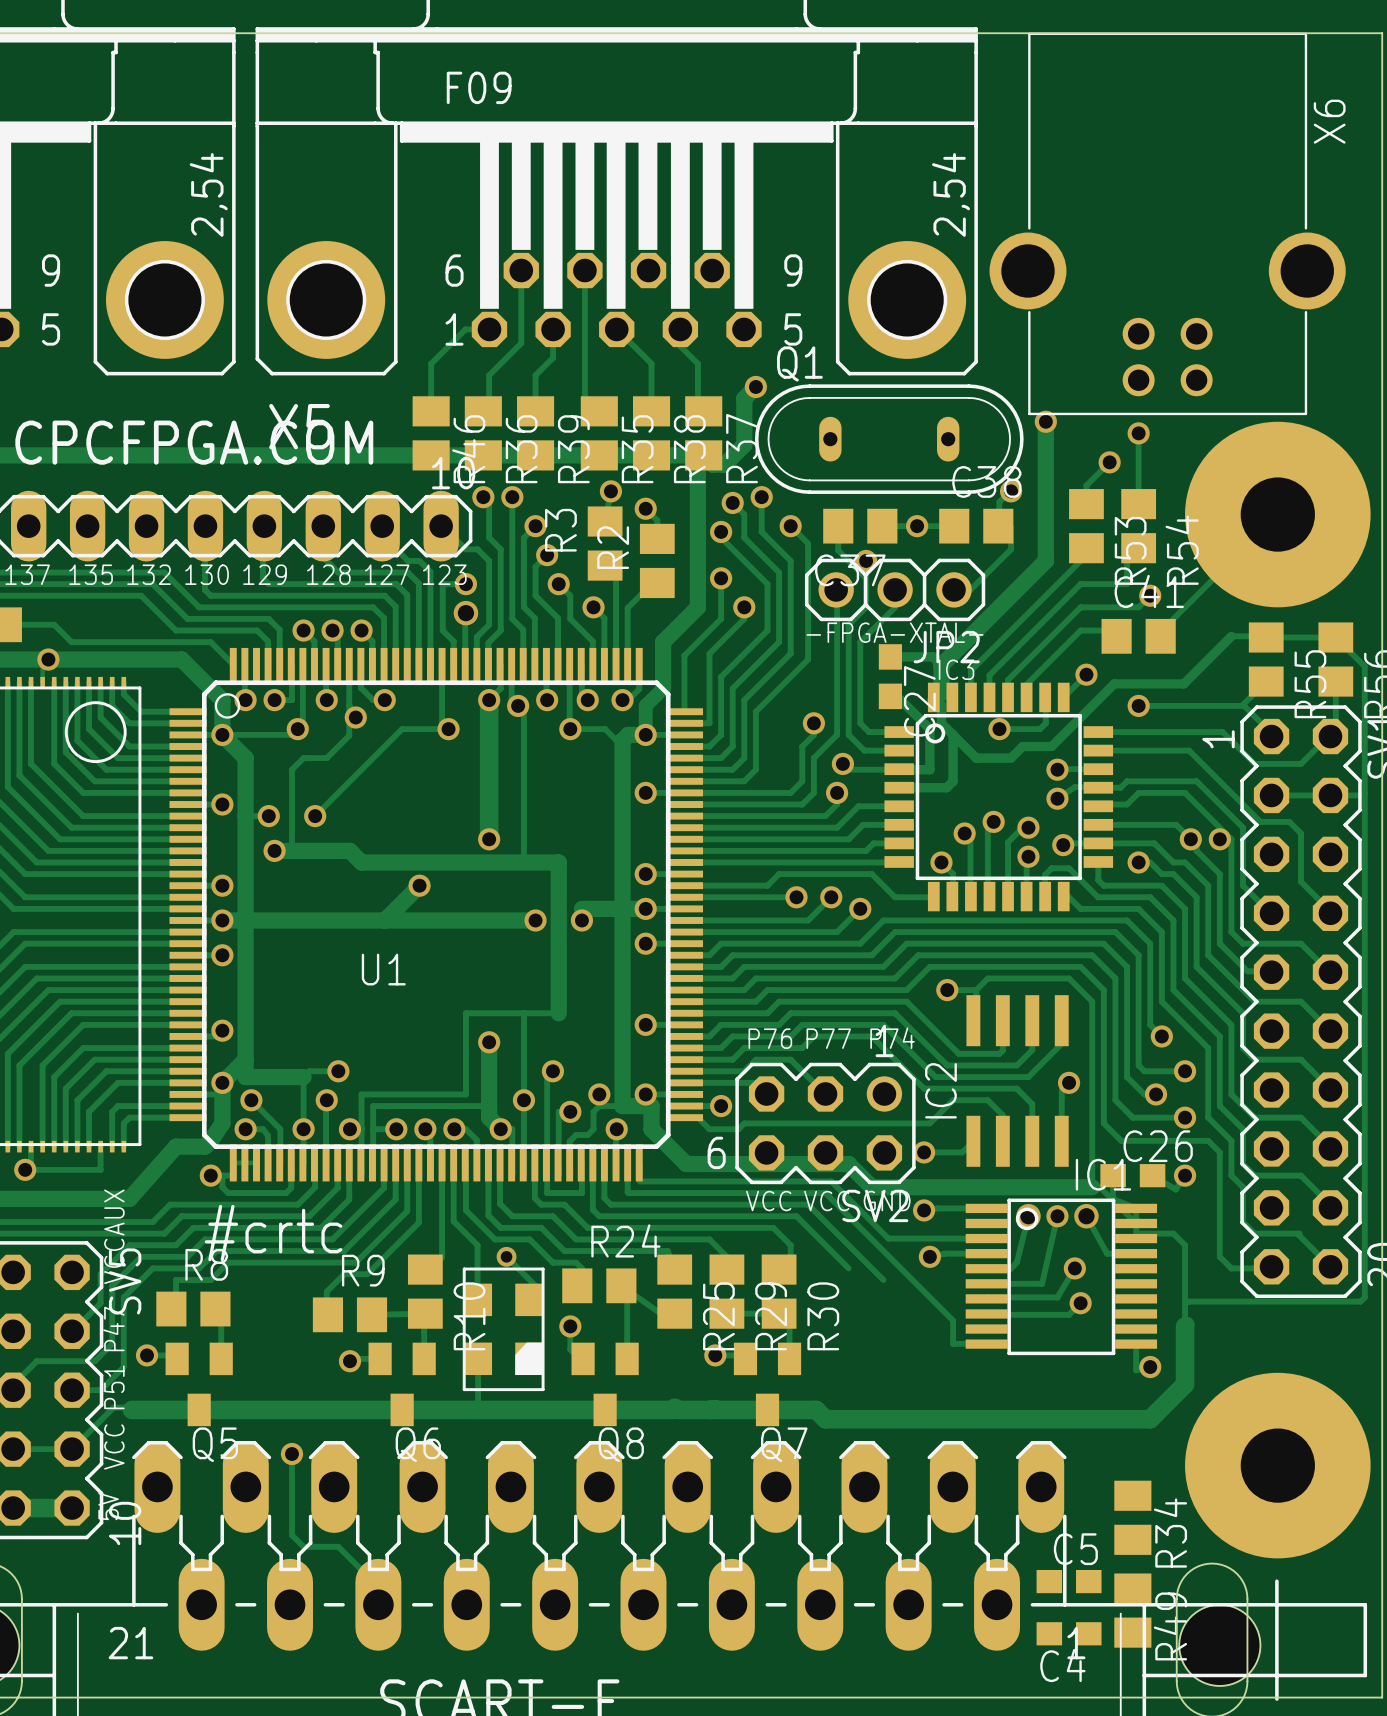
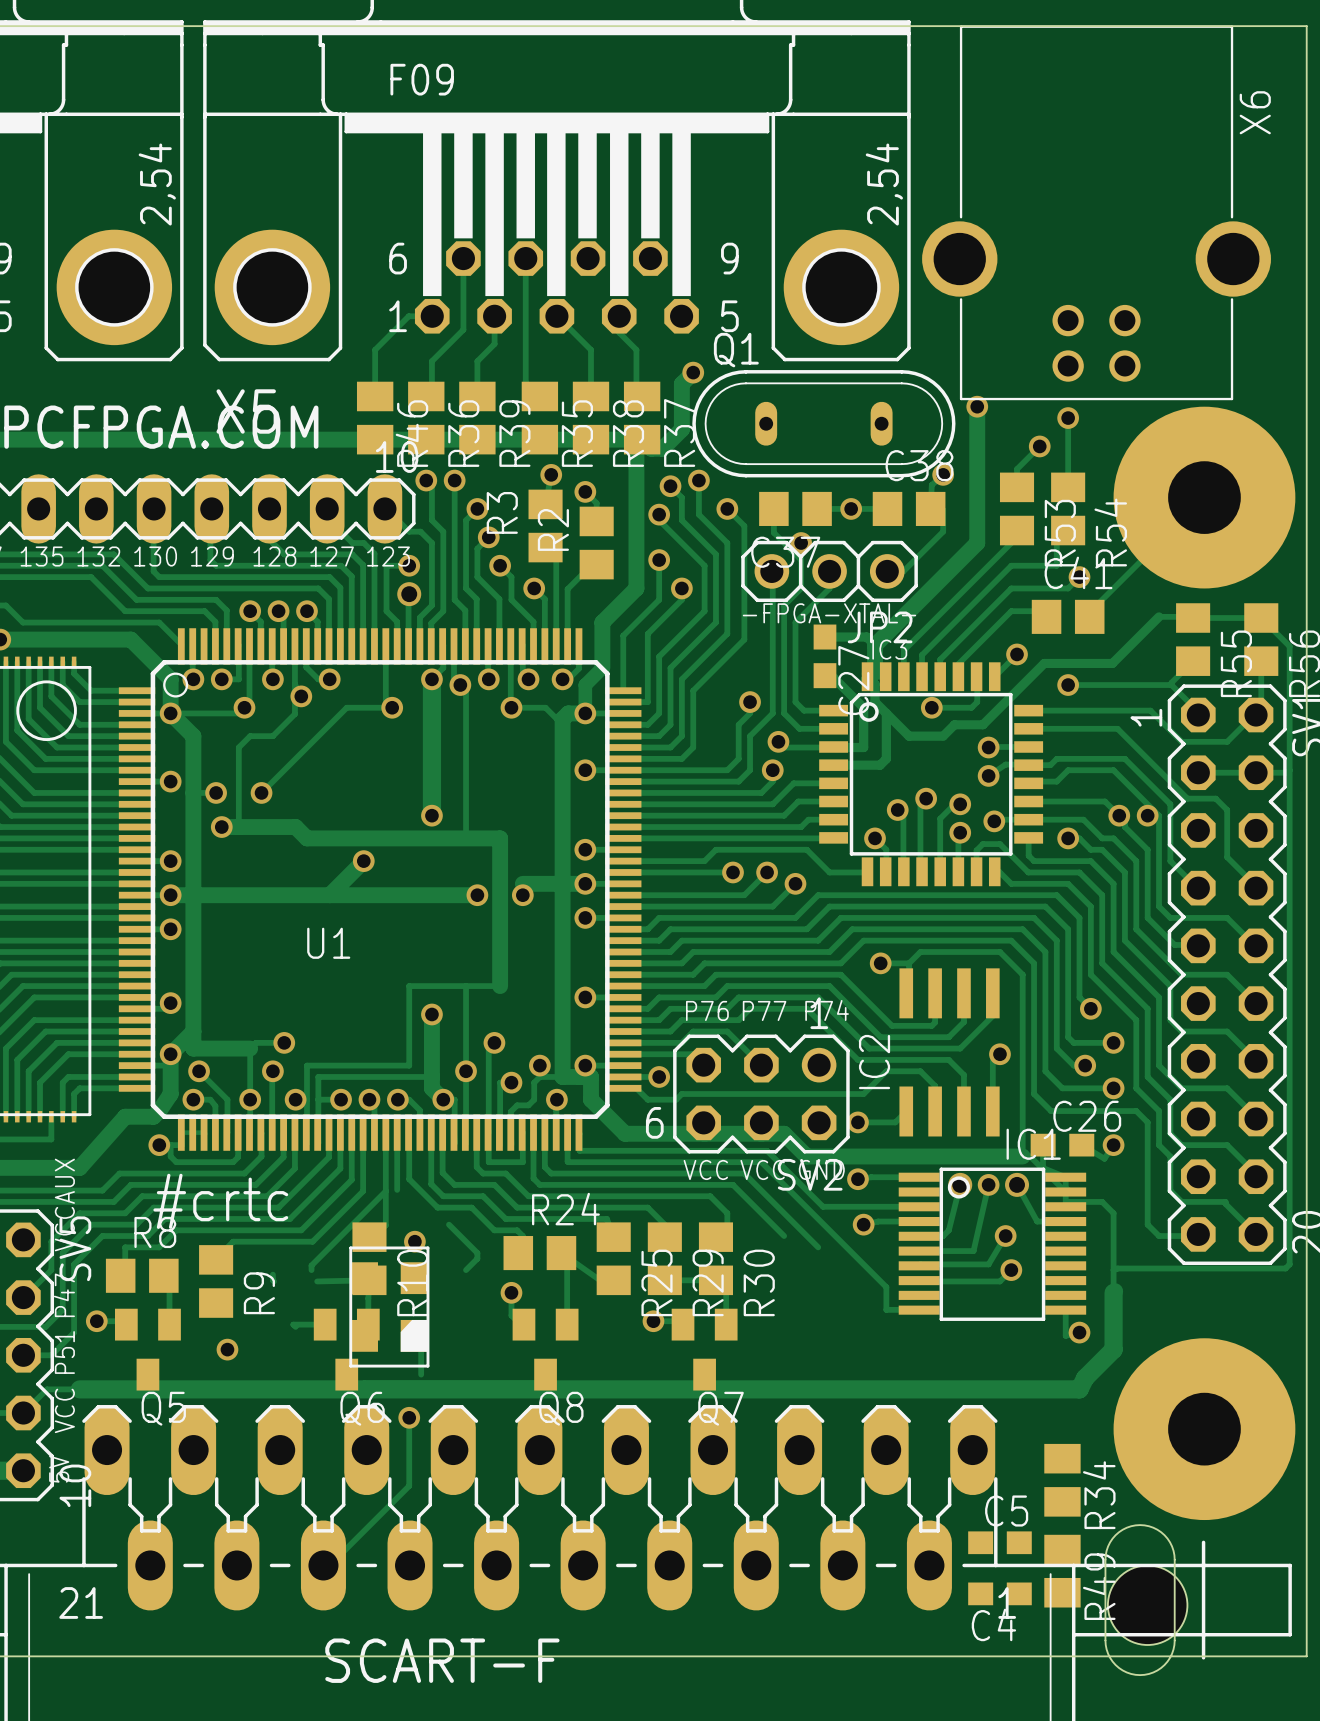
track: (453, 1221) (477, 1245) (478, 1299) -> none
track: none -> (385, 1191) (311, 1265) (311, 1270)
via: (506, 1256) -> none
track: (344, 1274) (326, 1291) (326, 1307) -> (289, 1241) (233, 1241) (216, 1259)
via: none -> (414, 1241)
R9 rotation: 0° (349, 1314) -> 90° clockwise (216, 1281)
R9 position: (349, 1314) -> (216, 1281)
part position: (503, 1329) -> (389, 1307)
via: (349, 1361) -> none
via: none -> (227, 1349)
track: (1156, 1413) (1150, 1419) (825, 1419) (816, 1409) (677, 1409) (674, 1407) (672, 1409) (410, 1409) (407, 1407) (402, 1409) (131, 1409) (176, 1407) (113, 1407) (96, 1425) -> (1085, 1378) (1079, 1389) (47, 1389)
track: (291, 1454) (291, 1535) (303, 1546) (338, 1546) (378, 1587) (378, 1604) -> (409, 1417) (409, 1485) (335, 1559) (329, 1559) (324, 1564)
via: (291, 1454) -> none
via: none -> (409, 1417)

